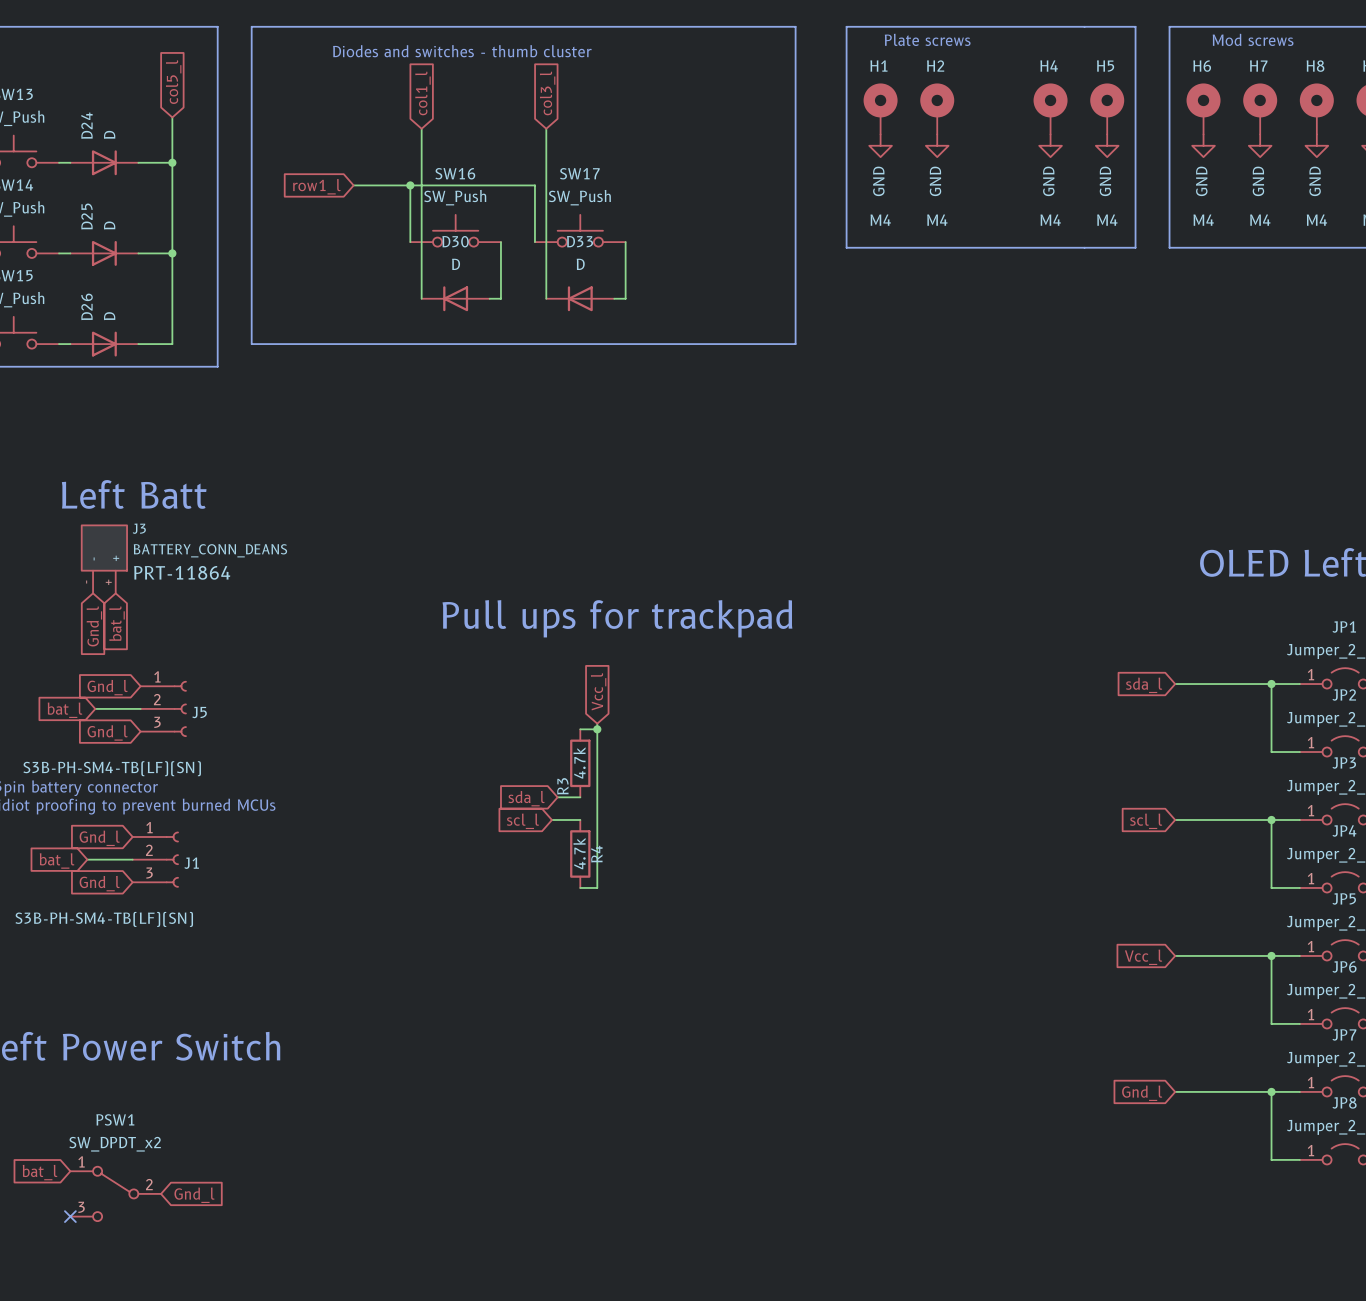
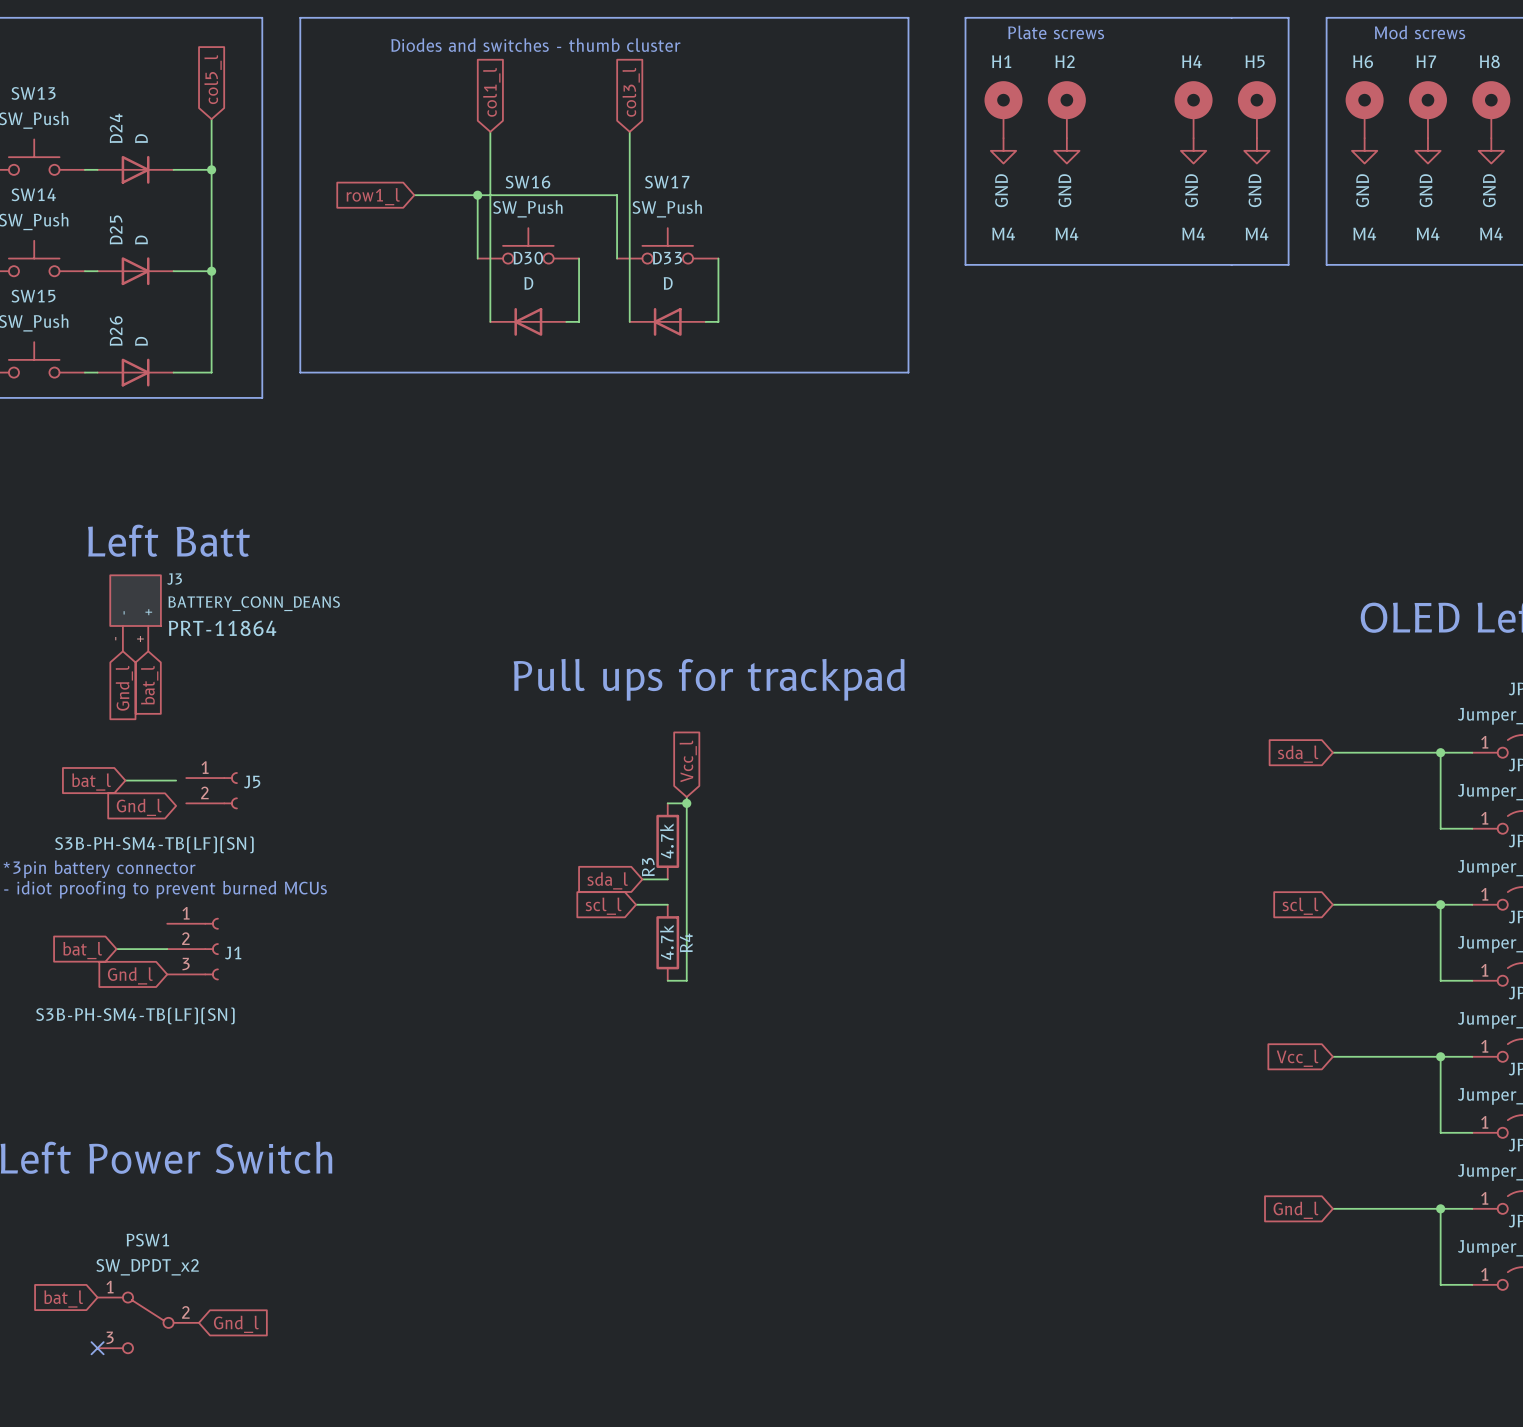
J5 symbol: [140, 681, 187, 737] -> [186, 772, 238, 810]
global label: Gnd_l (107, 687) -> none
global label: Gnd_l (99, 838) -> none

